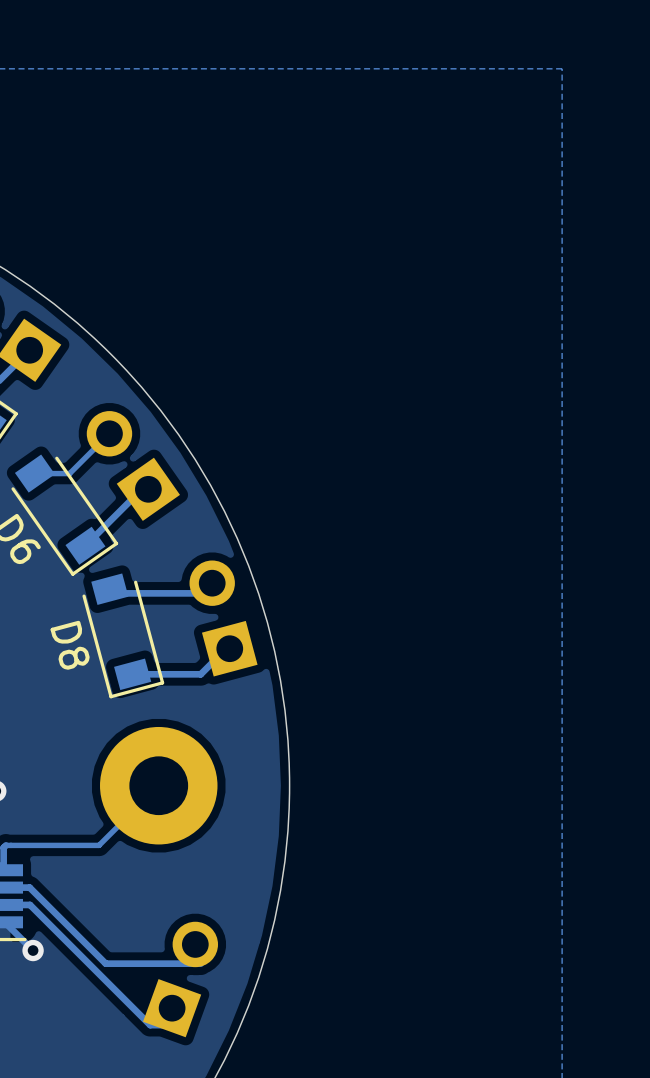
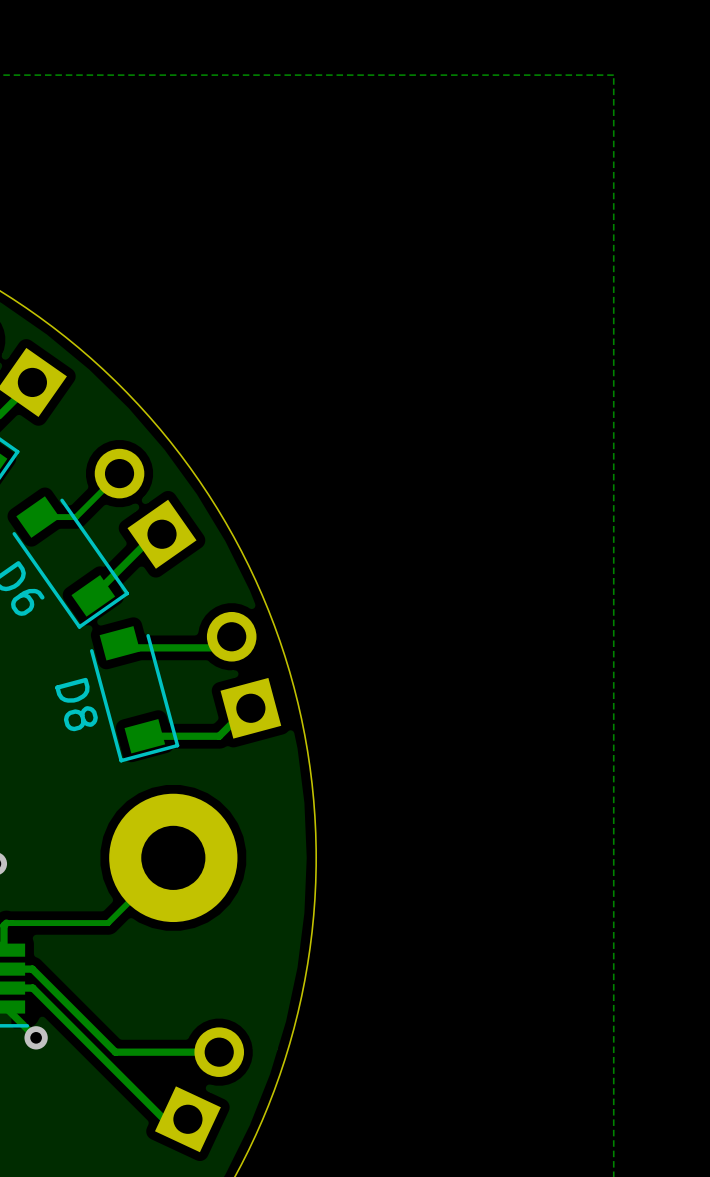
part rotation: 0° (180, 979) -> 5° clockwise (199, 1089)

